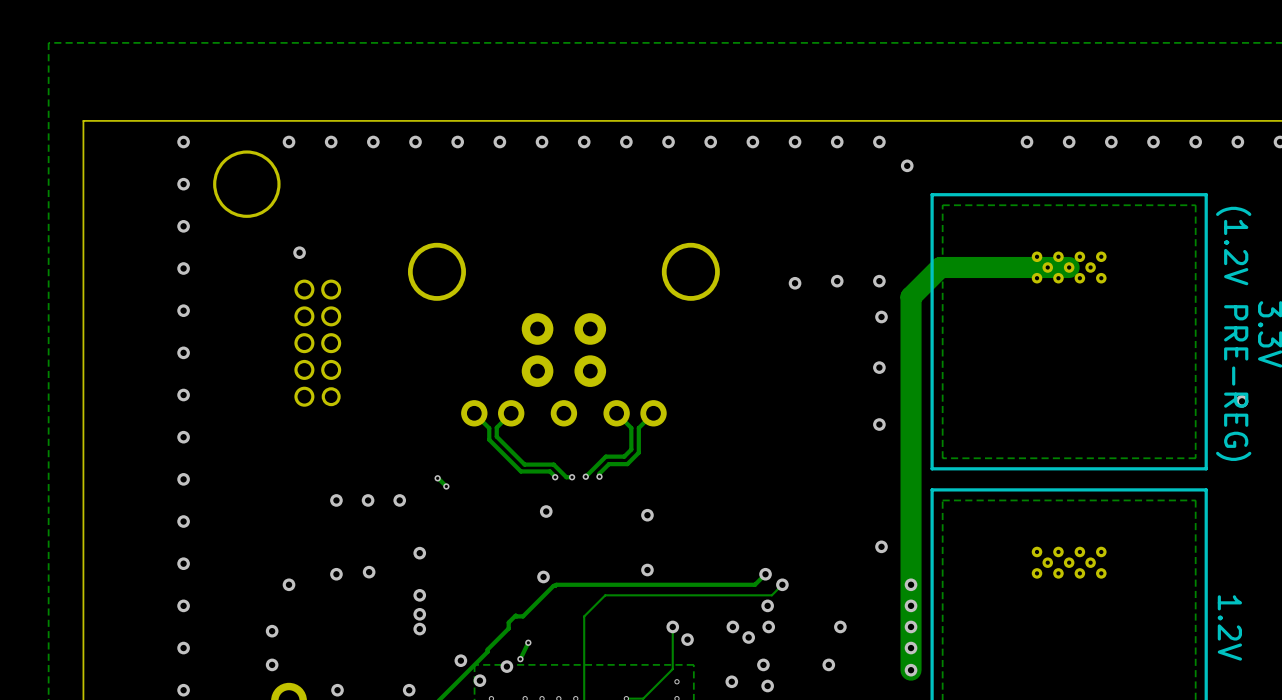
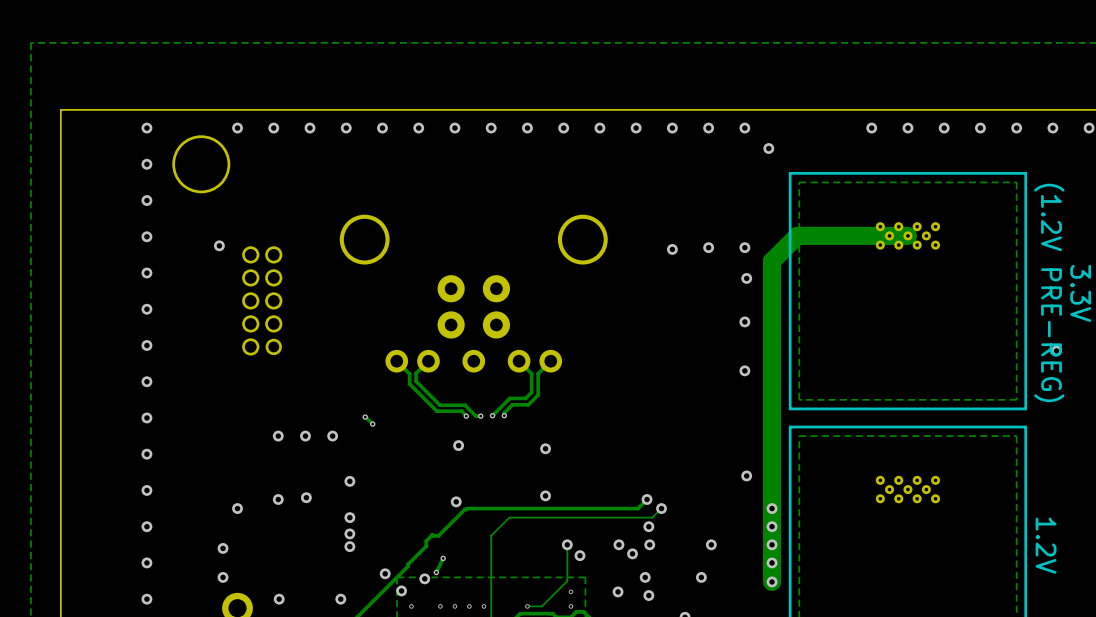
via position: (299, 252) -> (219, 245)

